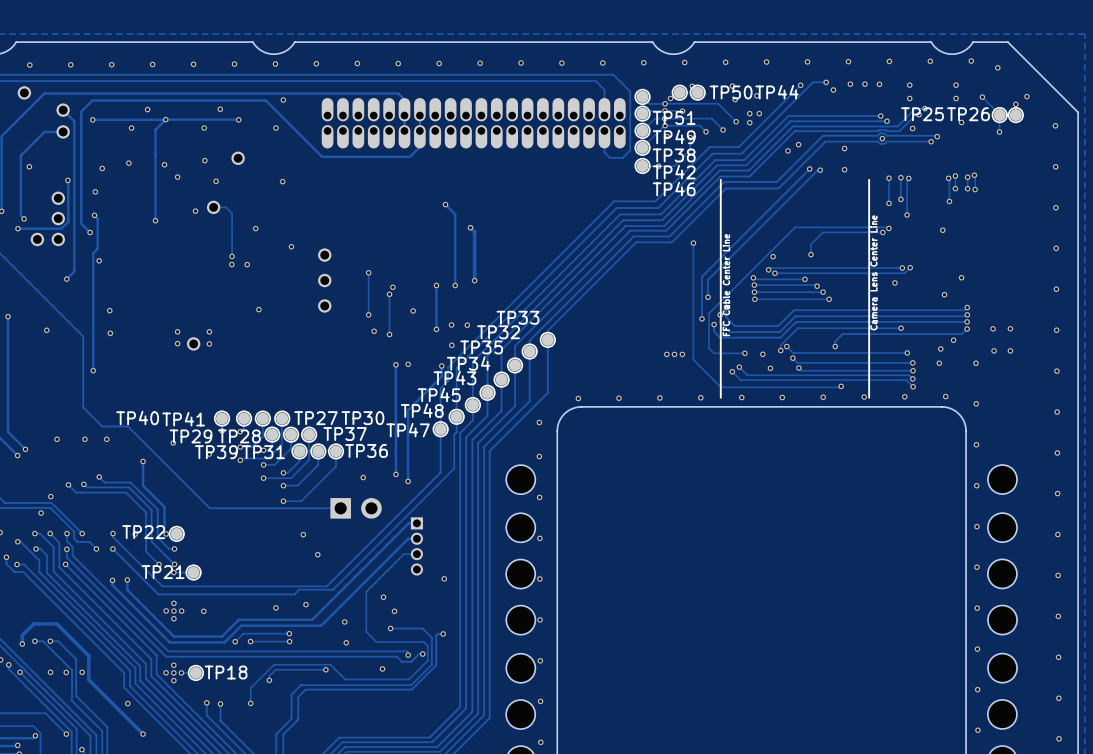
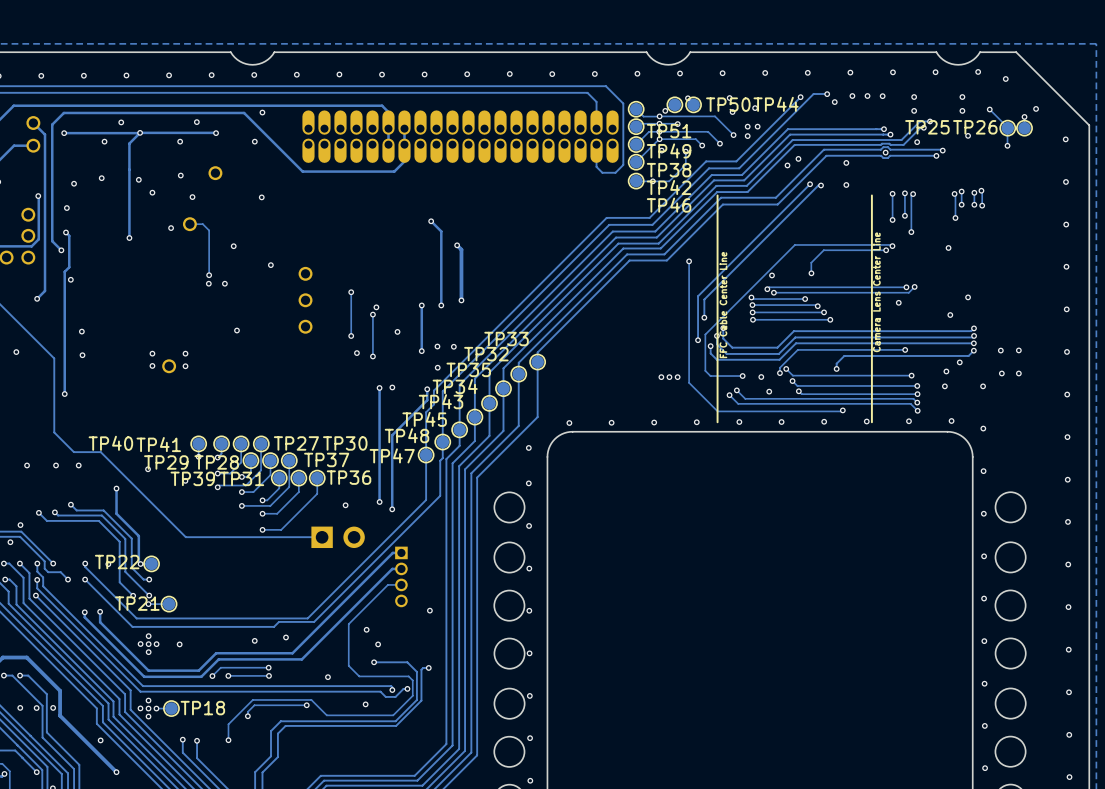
via: (303, 534) -> none
via: (317, 554) -> none
via: (344, 621) -> none

